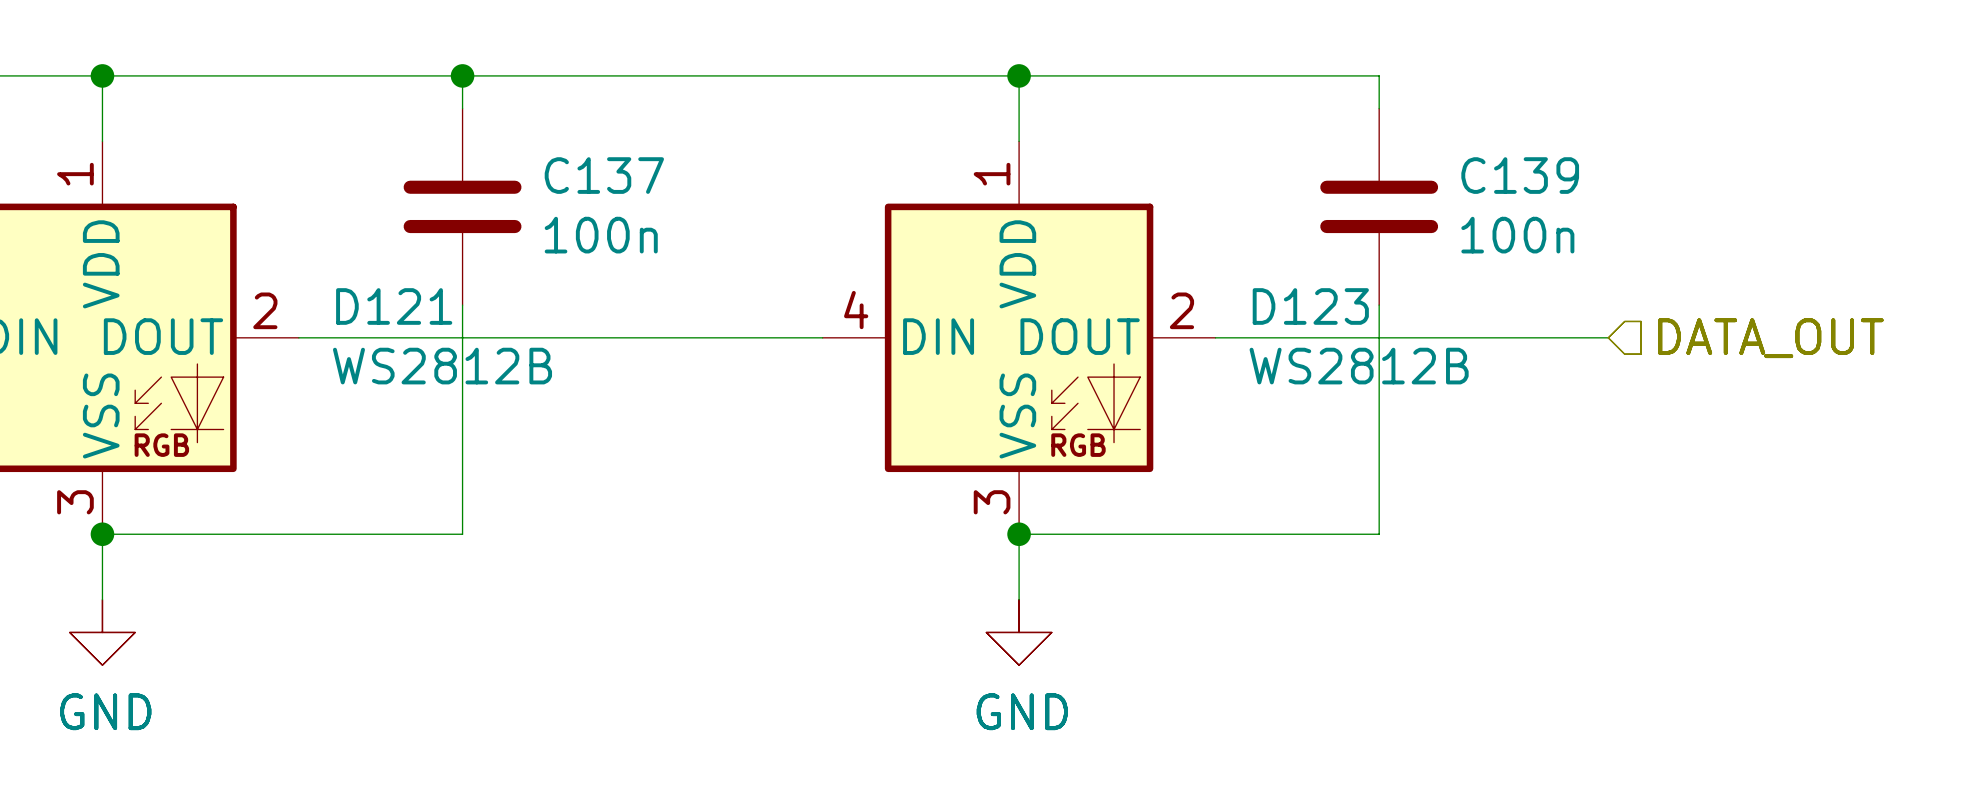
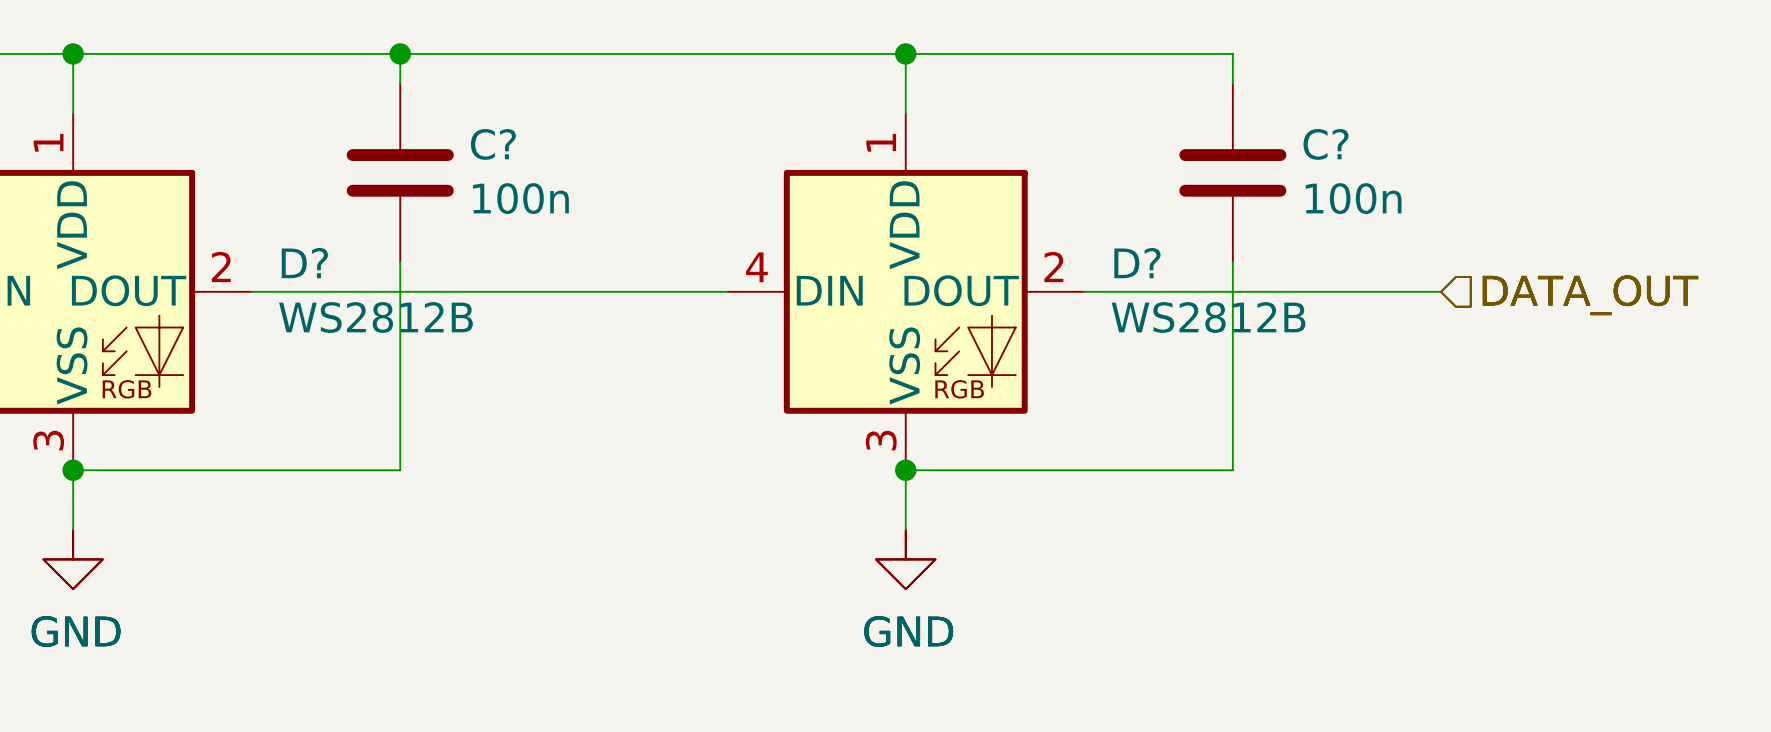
C137 name: C137 (604, 175) -> C? (493, 144)
C139 name: C139 (1520, 175) -> C? (1326, 144)
D121 name: D121 (394, 306) -> D? (304, 263)
D123 name: D123 (1310, 306) -> D? (1137, 263)

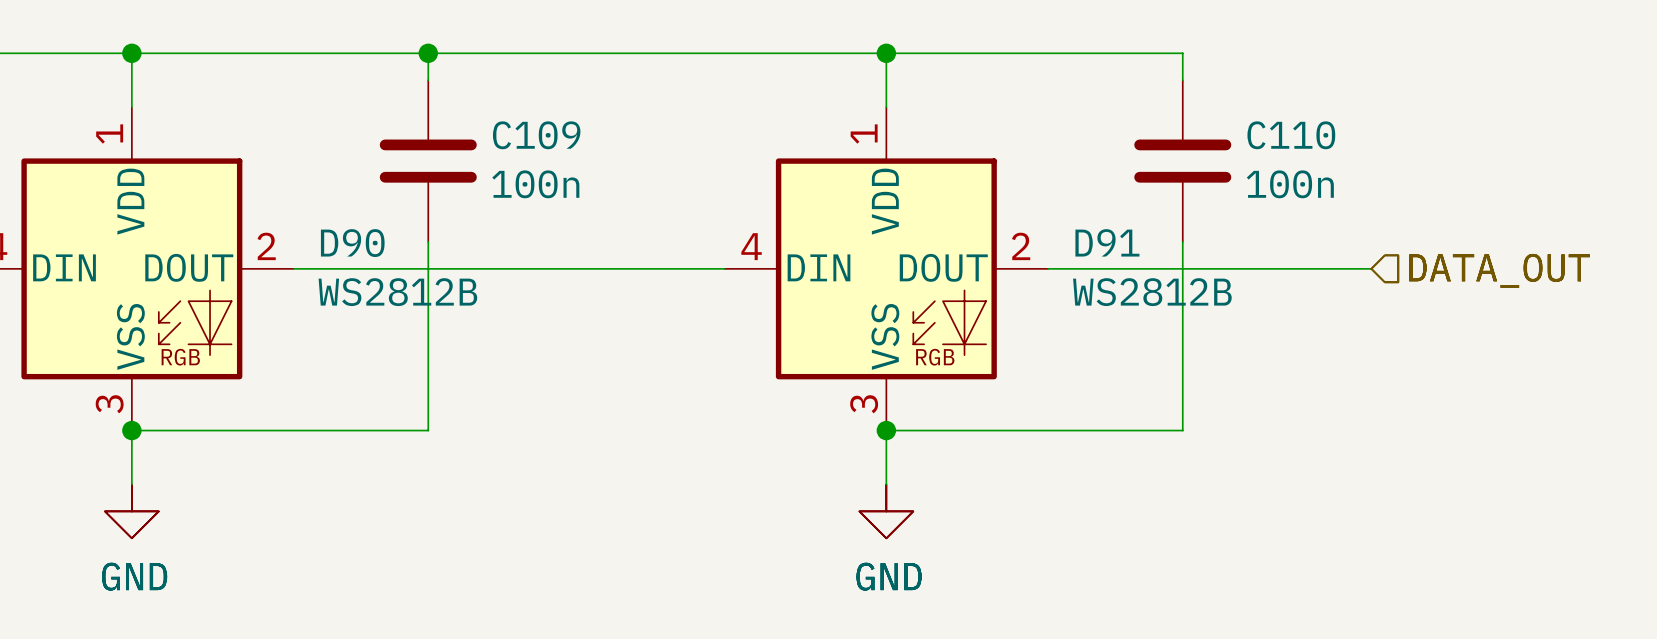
C? name: C? (493, 144) -> C109 (536, 135)
C? name: C? (1326, 144) -> C110 (1291, 135)
D? name: D? (304, 263) -> D90 (352, 243)
D? name: D? (1137, 263) -> D91 (1107, 242)

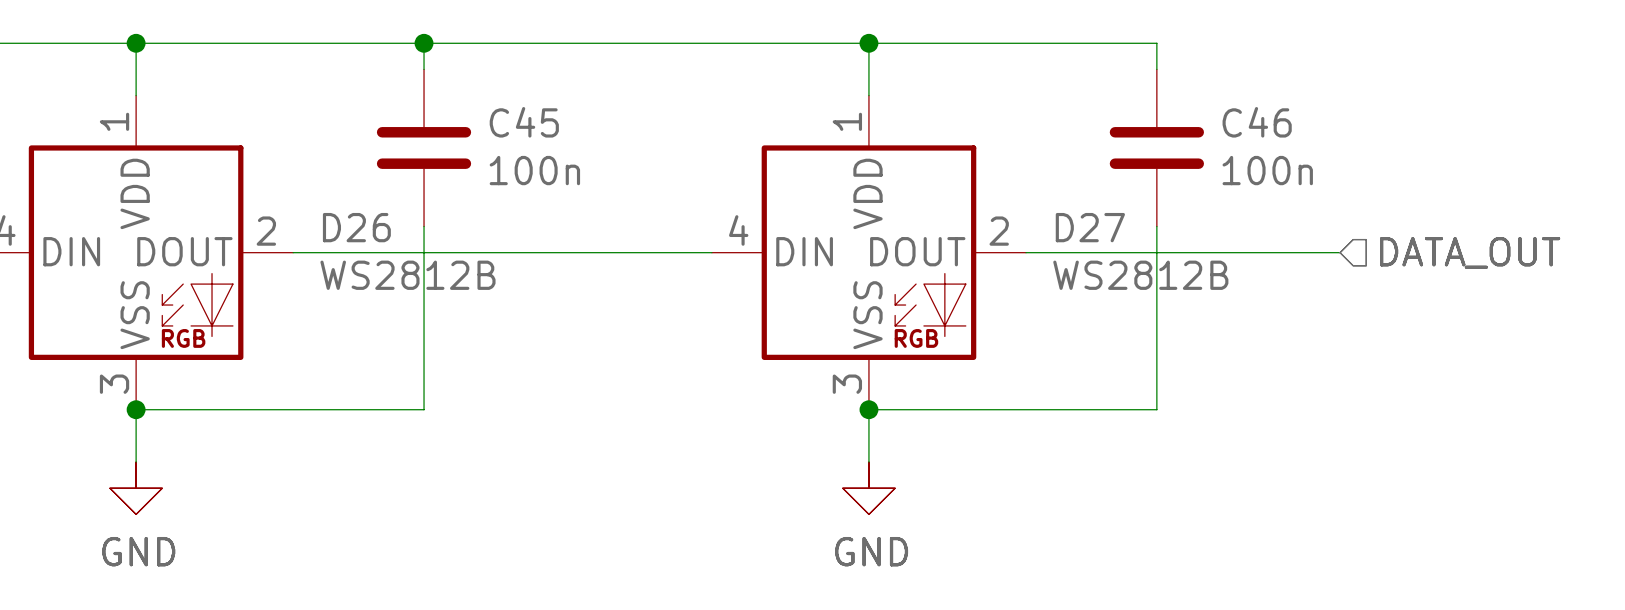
C109 name: C109 (536, 135) -> C45 (524, 122)
C110 name: C110 (1291, 135) -> C46 (1257, 122)
D91 name: D91 (1107, 242) -> D27 (1090, 227)
D90 name: D90 (352, 243) -> D26 (356, 227)

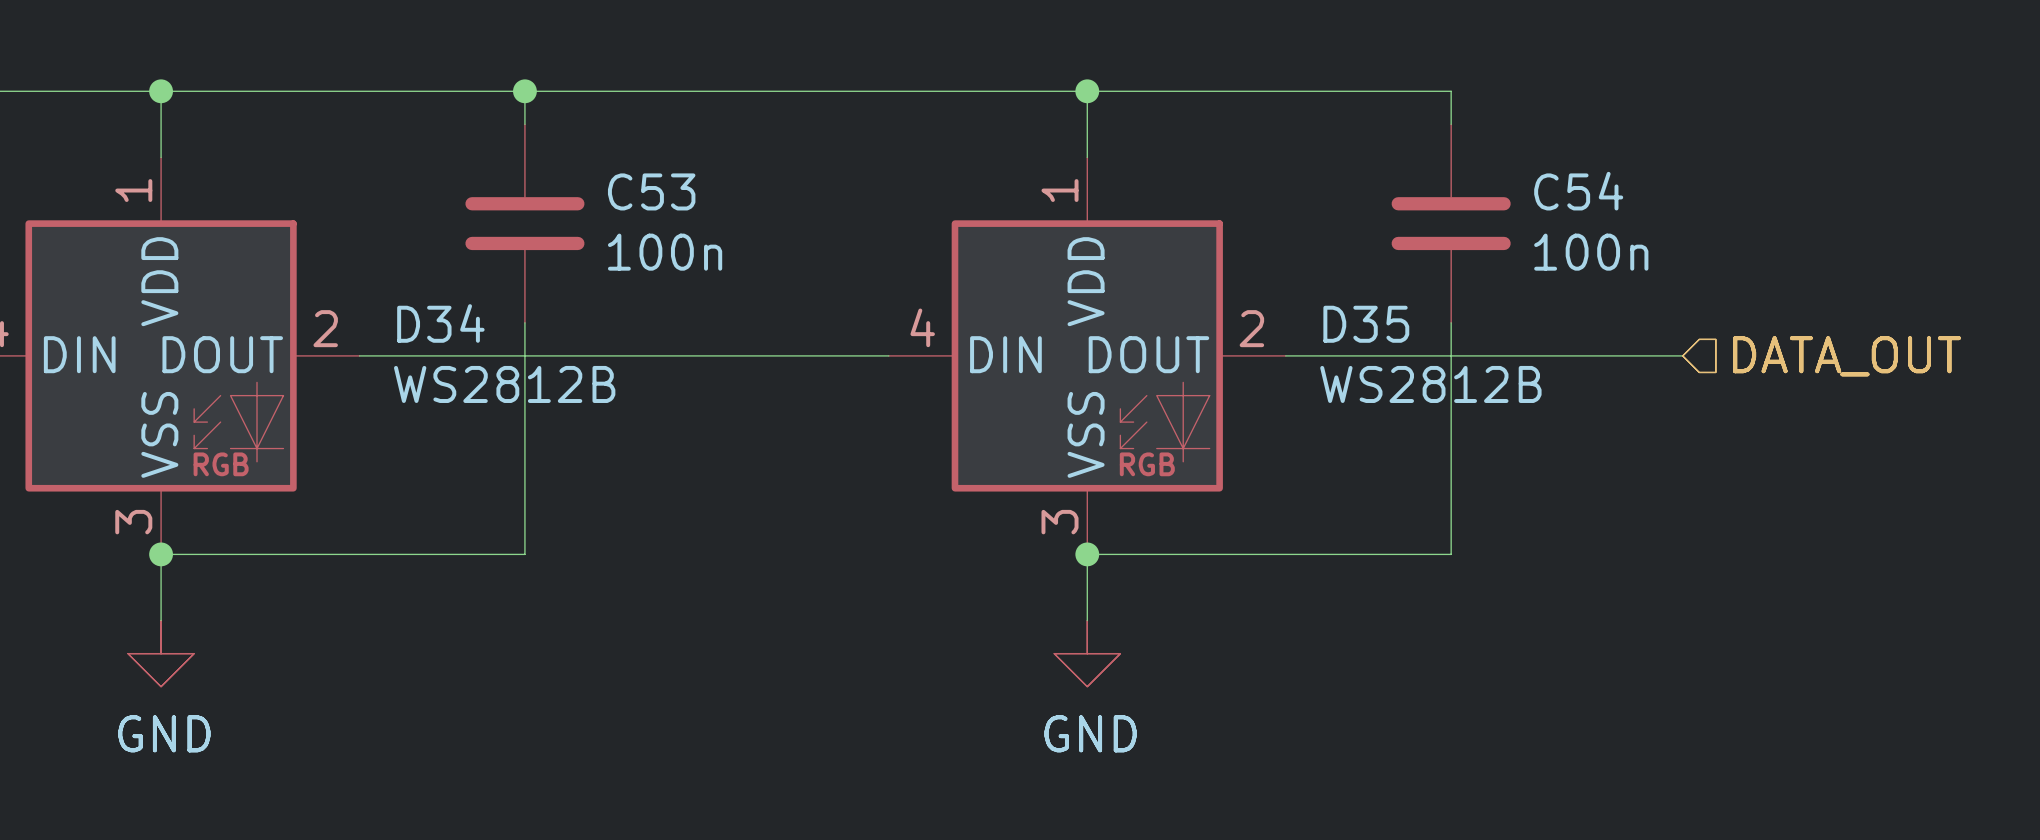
C45 name: C45 (524, 122) -> C53 (651, 191)
C46 name: C46 (1257, 122) -> C54 (1578, 191)
D26 name: D26 (356, 227) -> D34 (440, 323)
D27 name: D27 (1090, 227) -> D35 (1366, 324)

